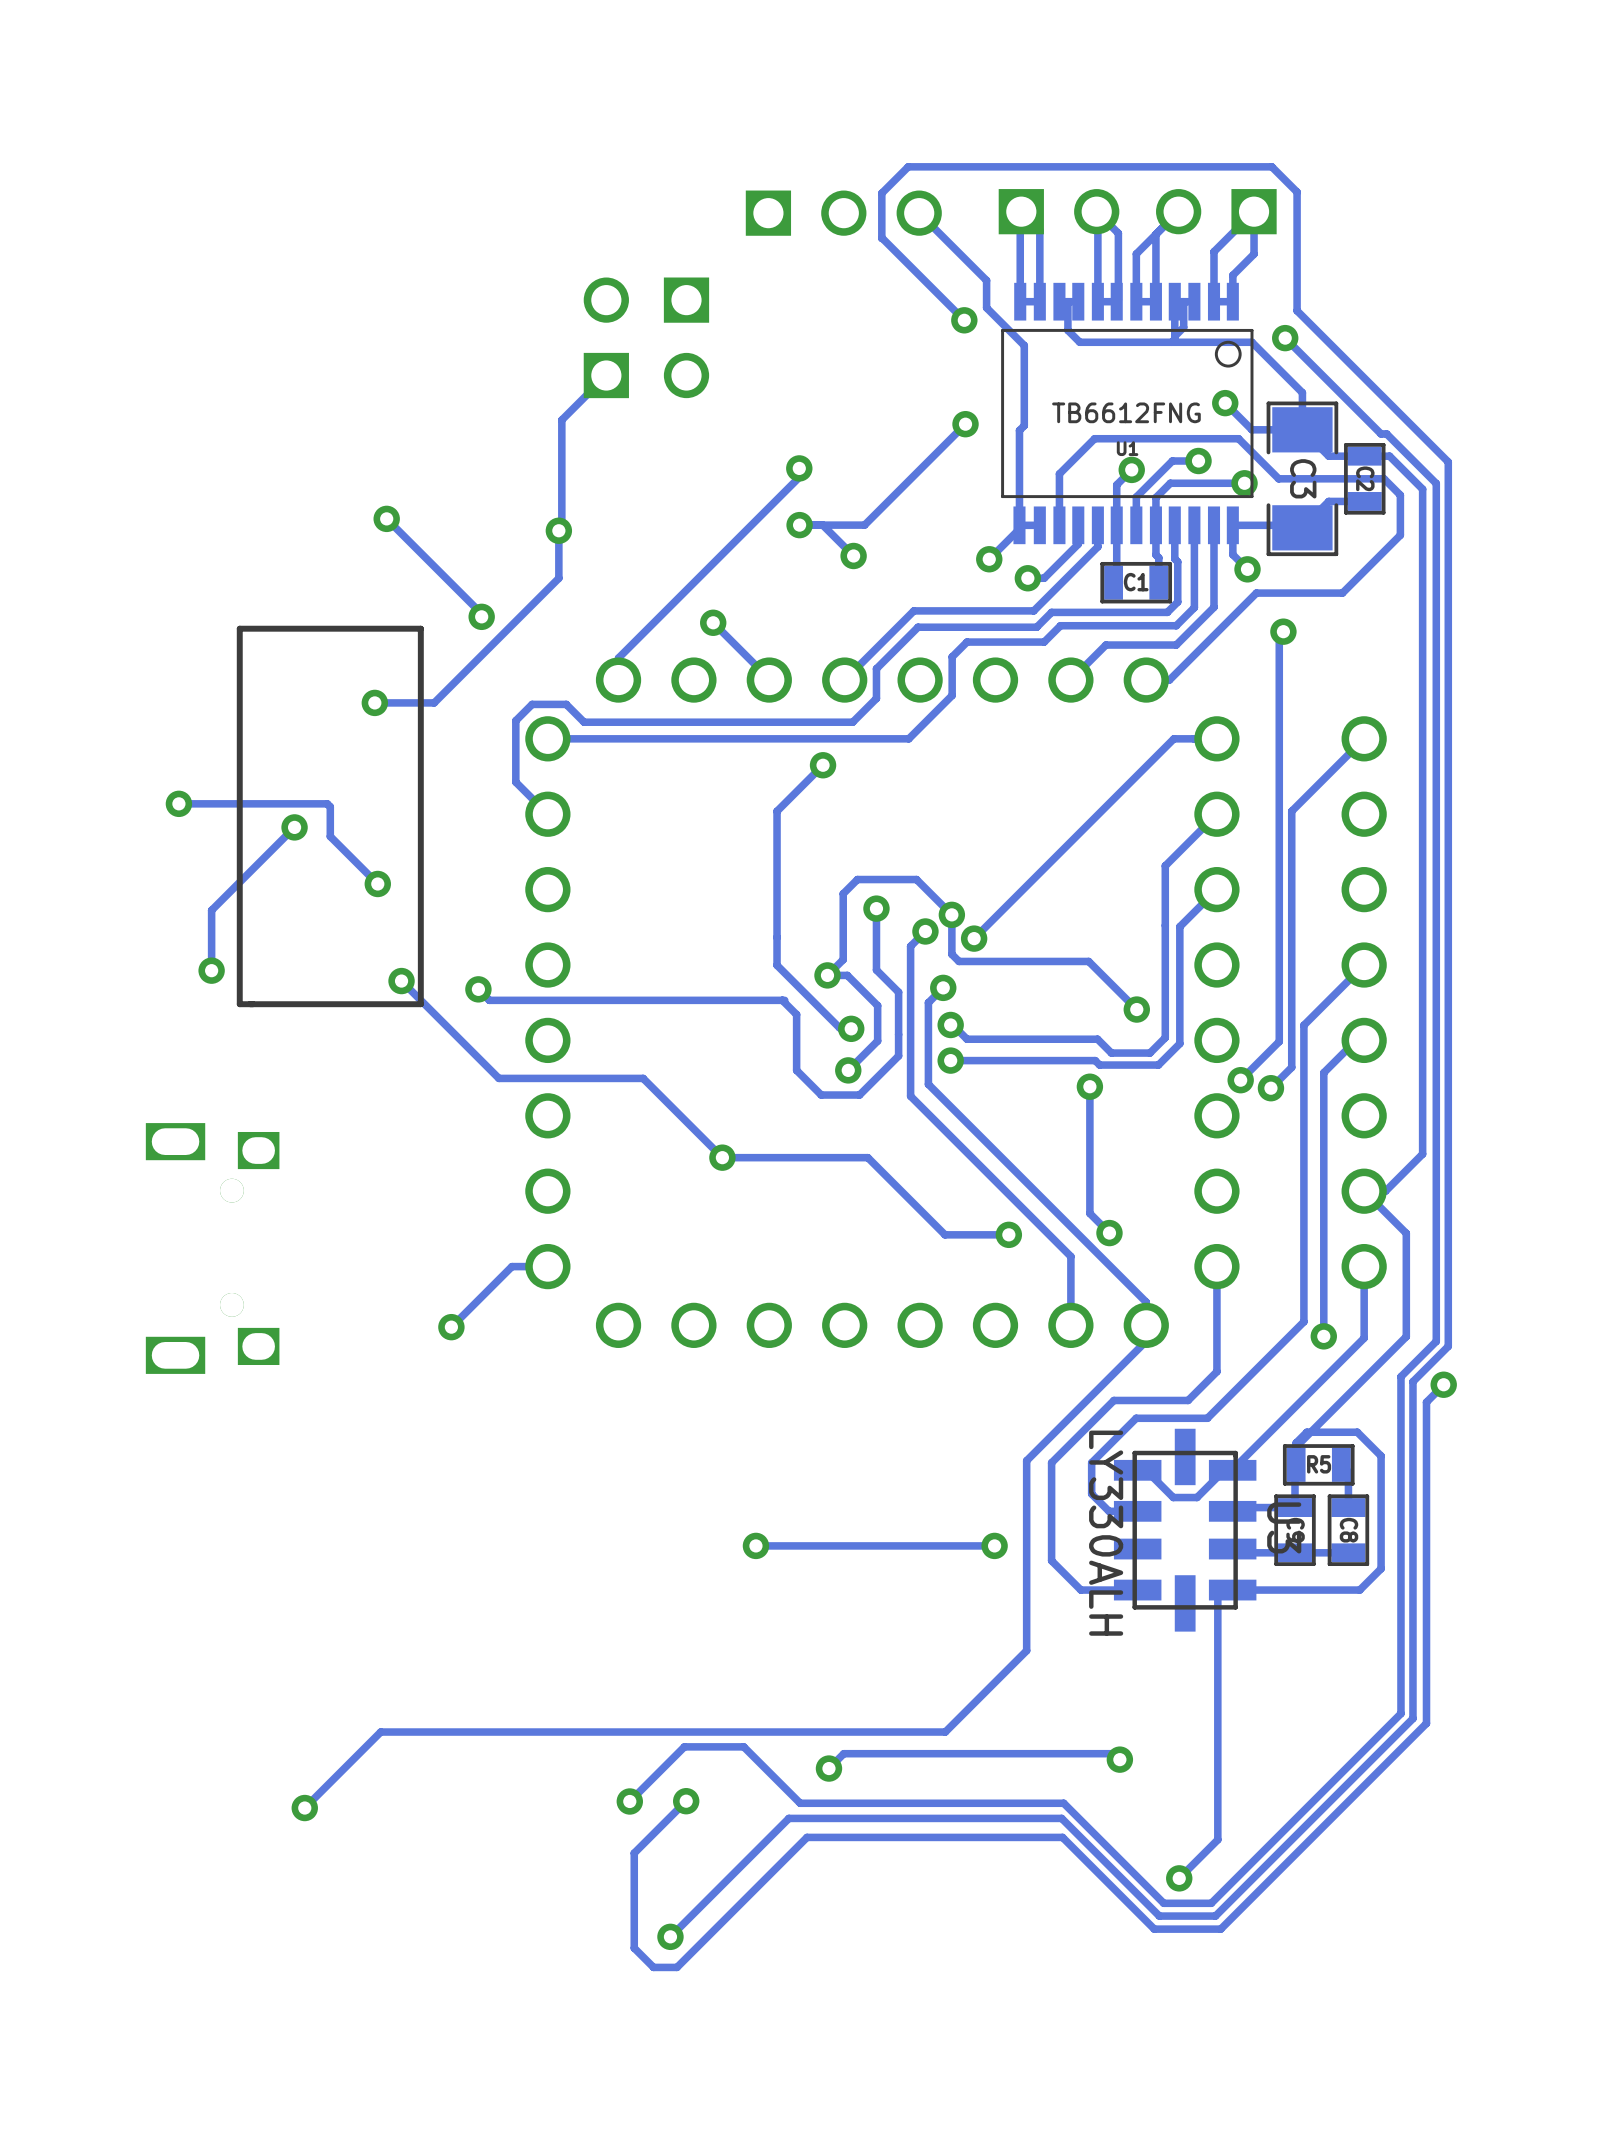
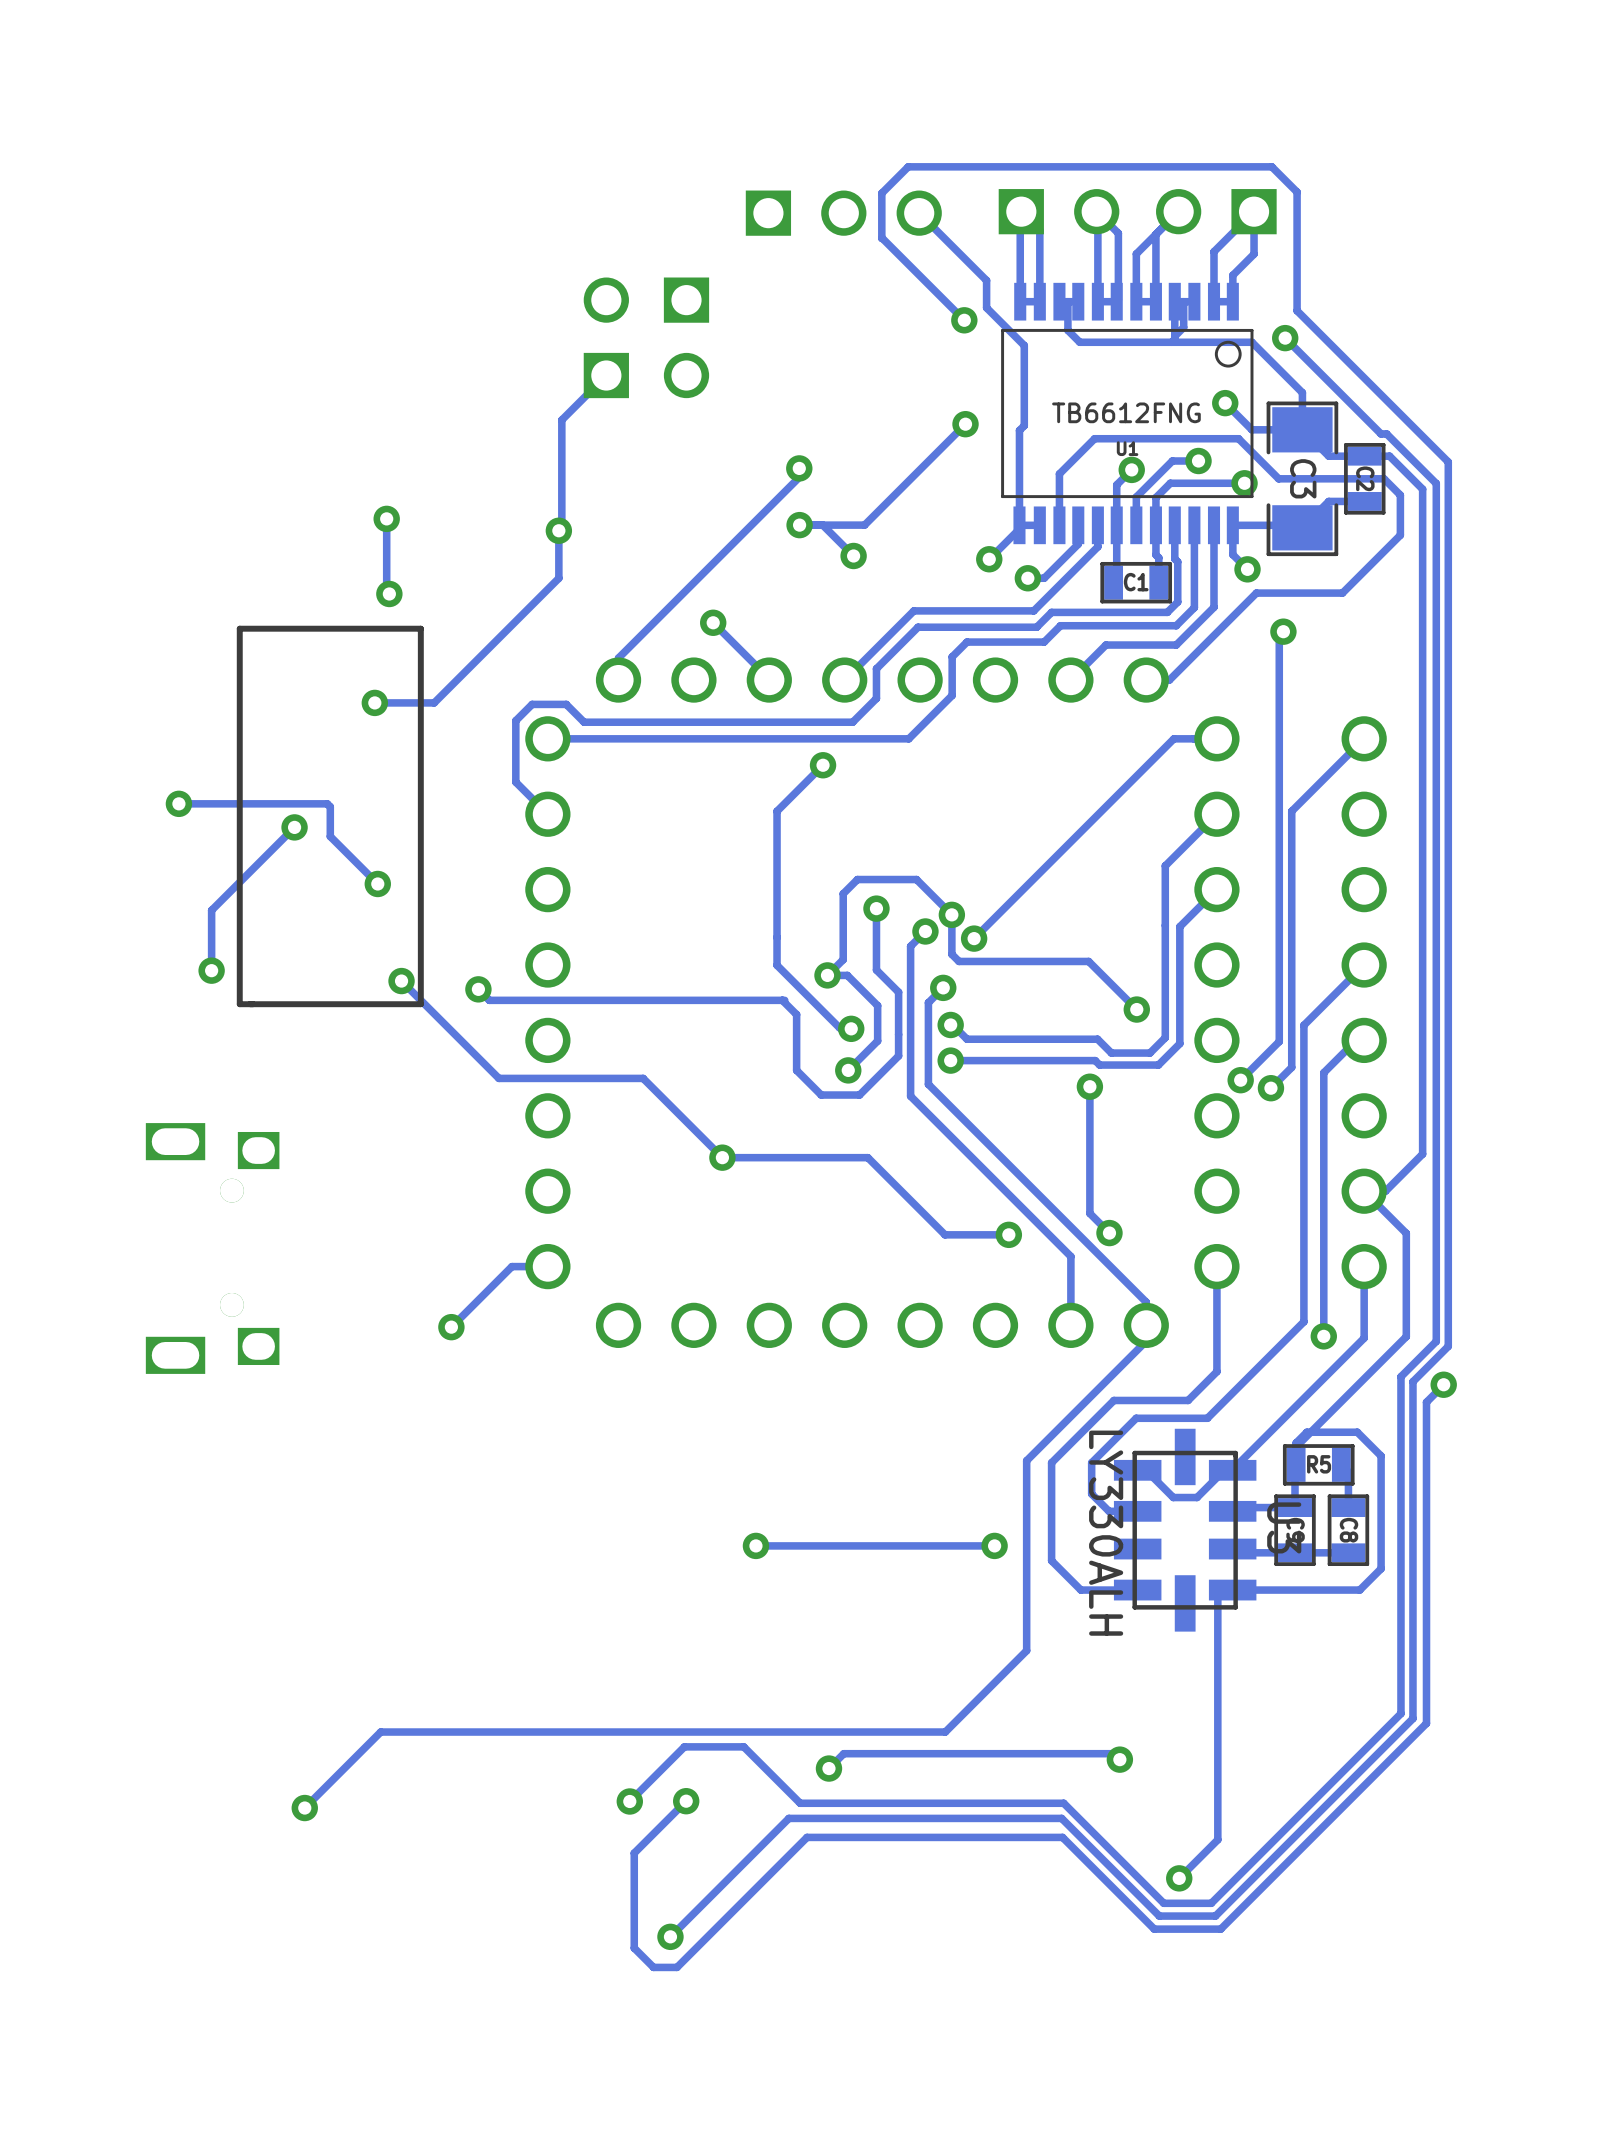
track: (386, 518) (481, 613) (481, 616) -> (386, 518) (386, 591) (389, 593)
via position: (481, 616) -> (389, 593)

